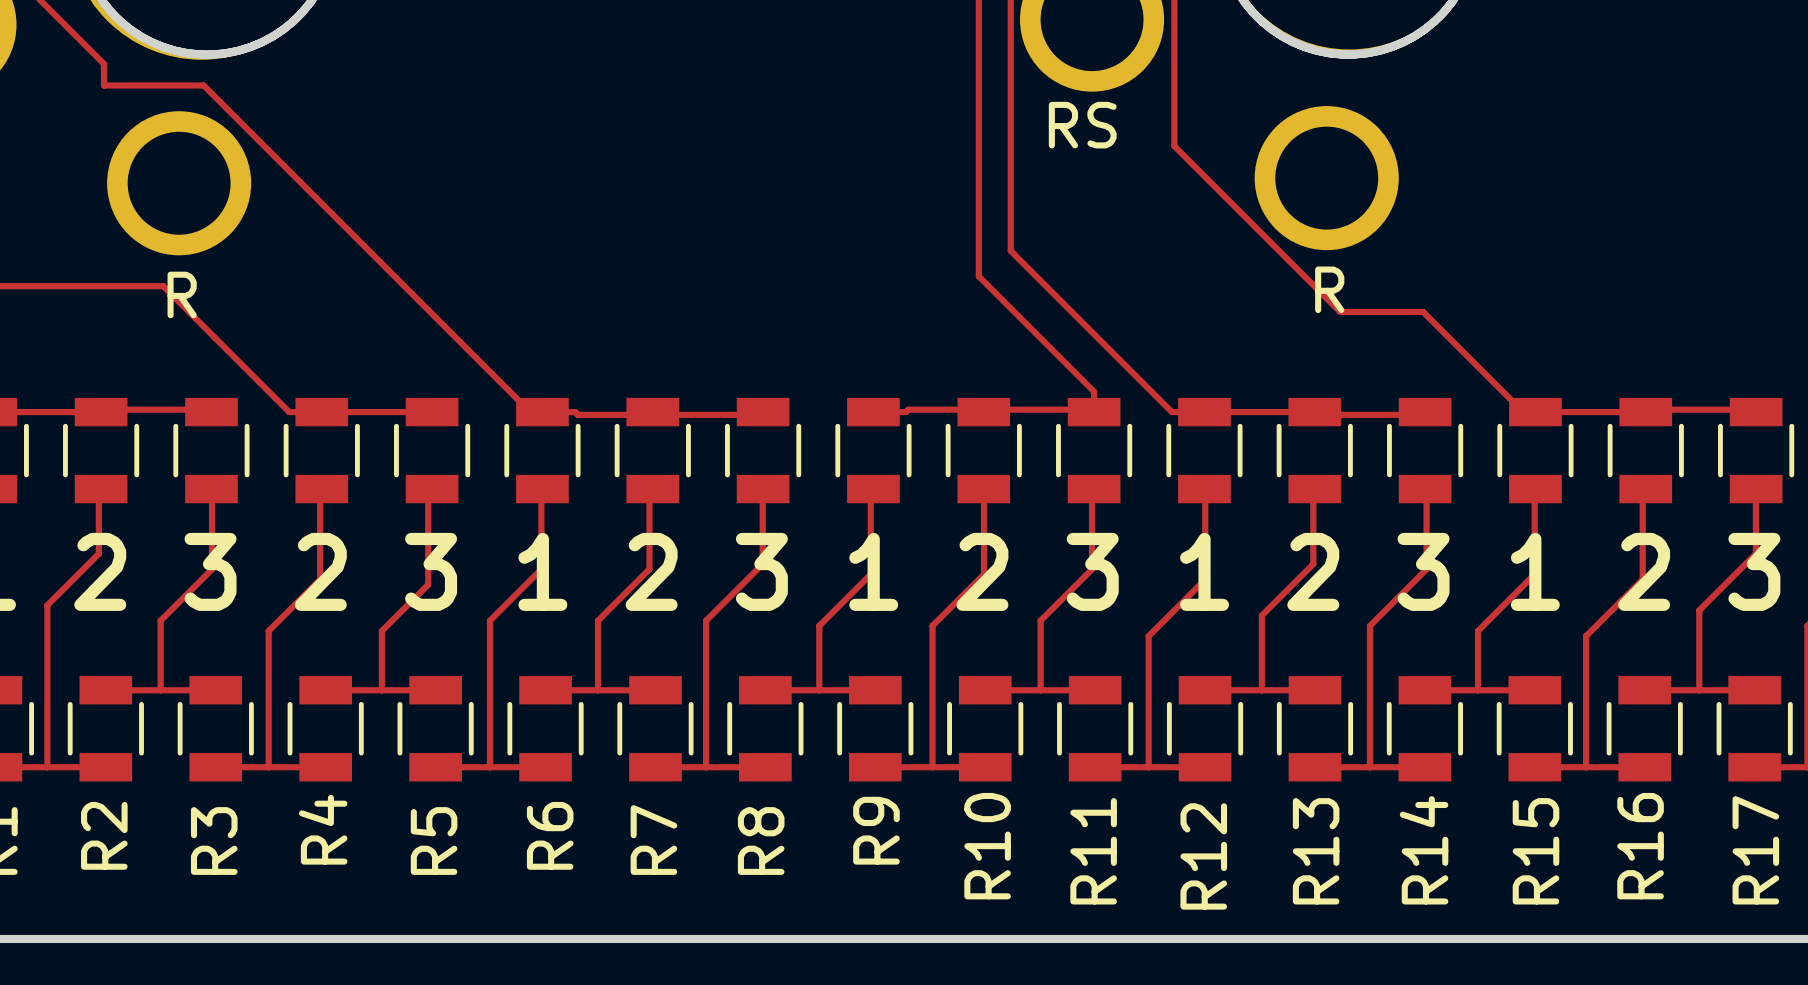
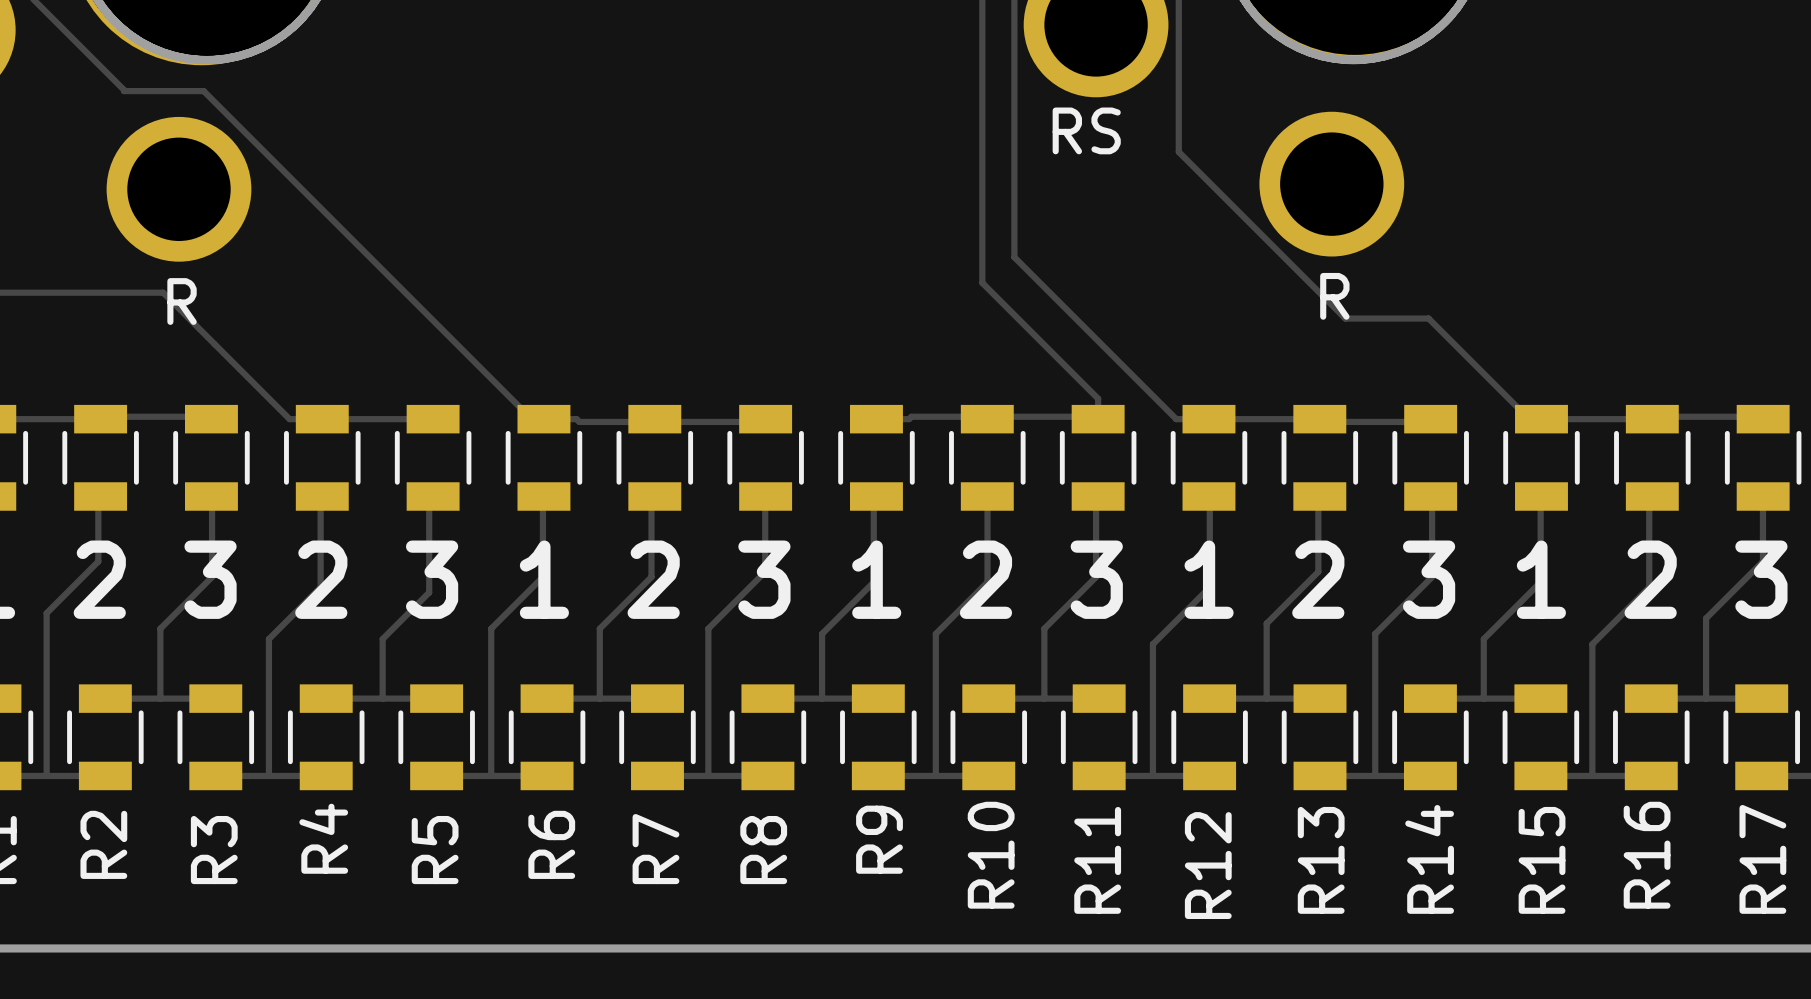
track: (103, 63) (103, 85) (124, 85) -> (103, 69) (124, 91)

